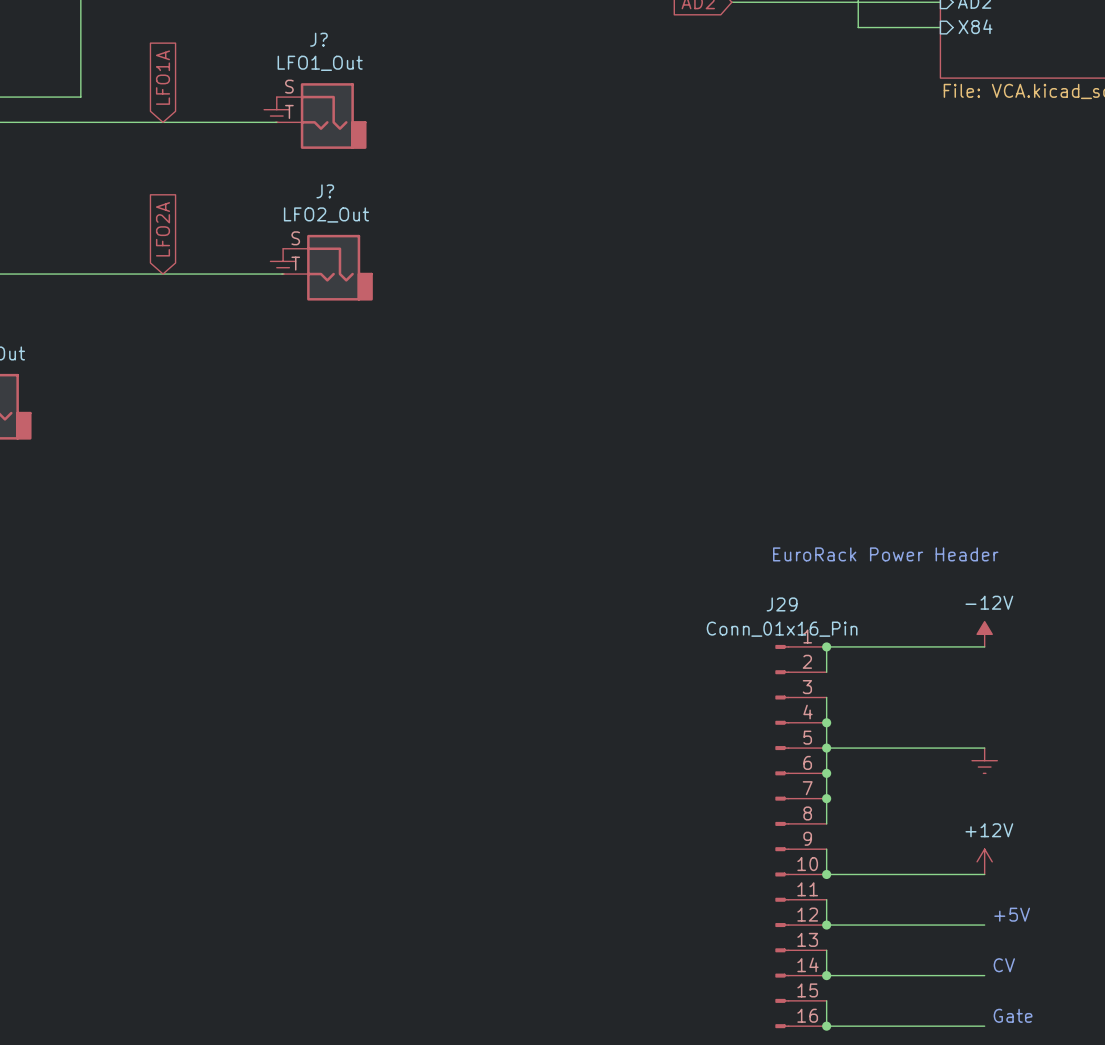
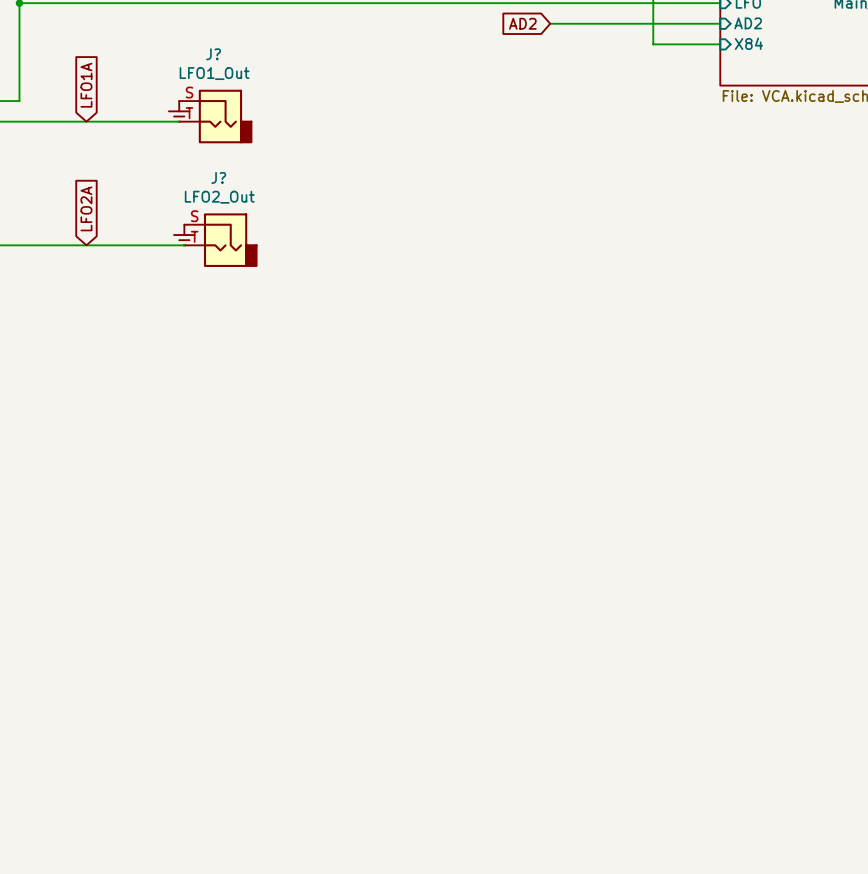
text: EuroRack Power Header (885, 554) -> none
power symbol: -12V (984, 634) -> none
junction: (826, 646) -> none
wire: (984, 646) (826, 646) (826, 672) -> none
wire: (826, 697) (826, 823) -> none
junction: (826, 722) -> none
wire: (826, 748) (984, 748) -> none
junction: (826, 748) -> none
power symbol: (984, 760) -> none
junction: (826, 773) -> none
junction: (826, 798) -> none
J29: Conn_01x16_Pin (800, 836) -> none
wire: (826, 849) (826, 874) (984, 874) -> none
power symbol: +12V (984, 861) -> none
junction: (826, 874) -> none
wire: (826, 899) (826, 925) (984, 925) -> none
text: +5V (1012, 914) -> none
junction: (826, 925) -> none
wire: (826, 950) (826, 975) (984, 975) -> none
text: CV (1004, 965) -> none
junction: (826, 975) -> none
wire: (826, 1000) (826, 1026) (984, 1026) -> none
text: Gate (1013, 1015) -> none
junction: (826, 1026) -> none

